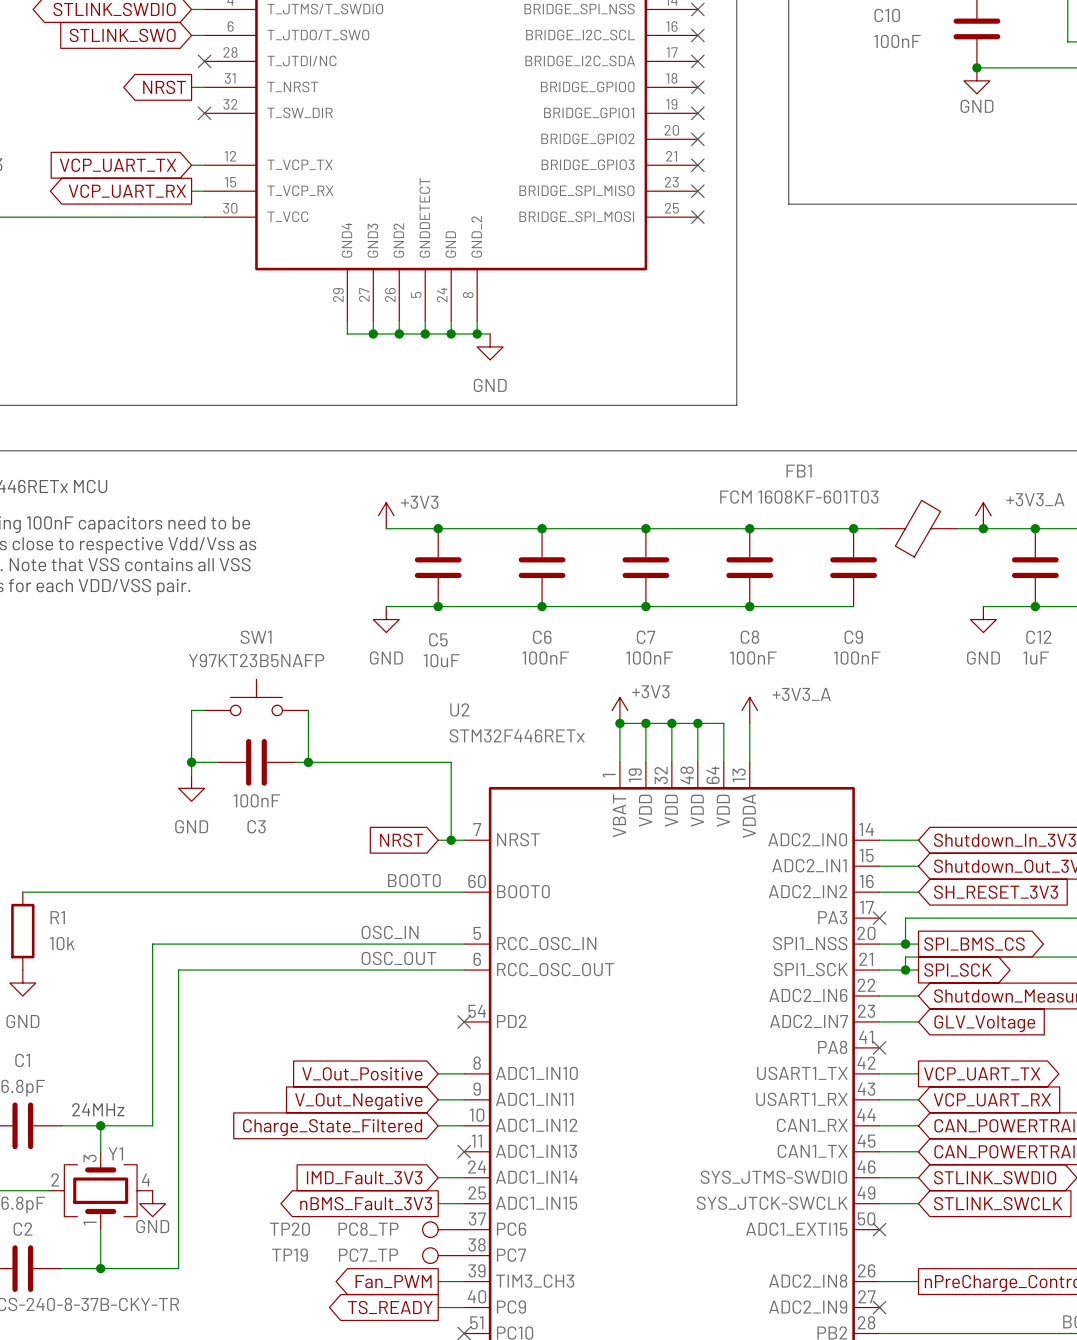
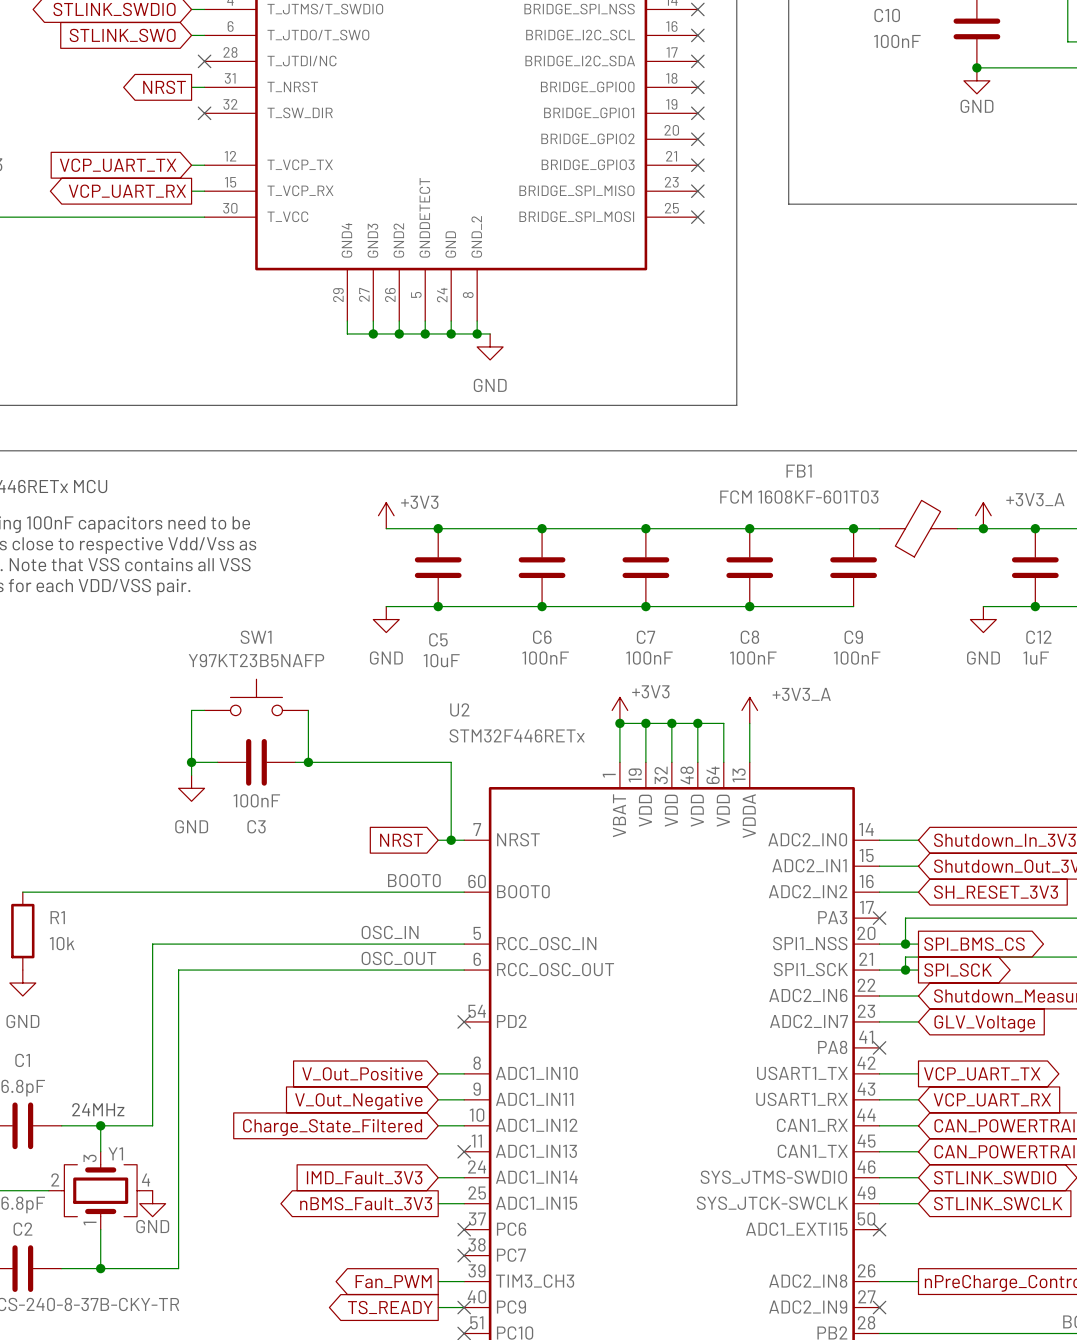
TP20: PC8_TP (443, 1229) -> none
no-connect mark: none -> (464, 1229)
TP19: PC7_TP (443, 1255) -> none
no-connect mark: none -> (464, 1255)
no-connect mark: none -> (464, 1307)

